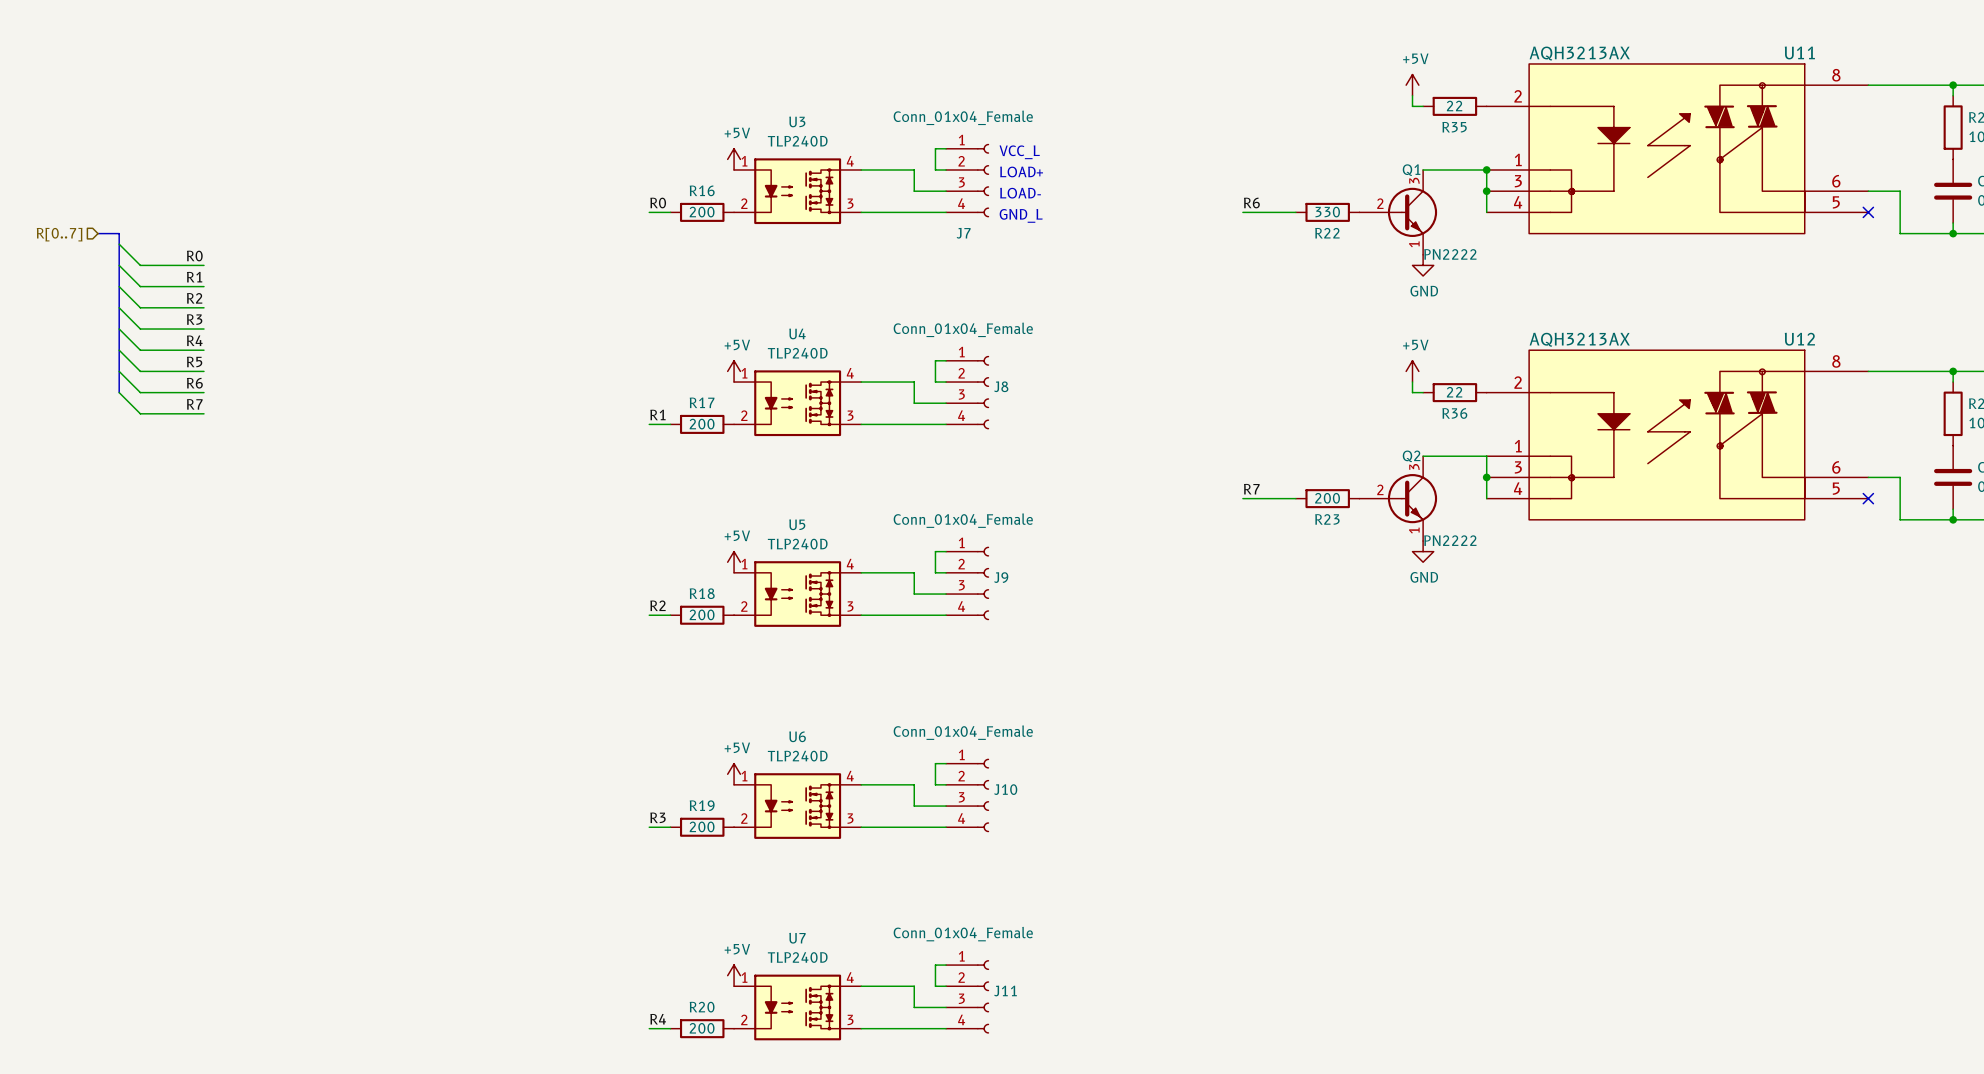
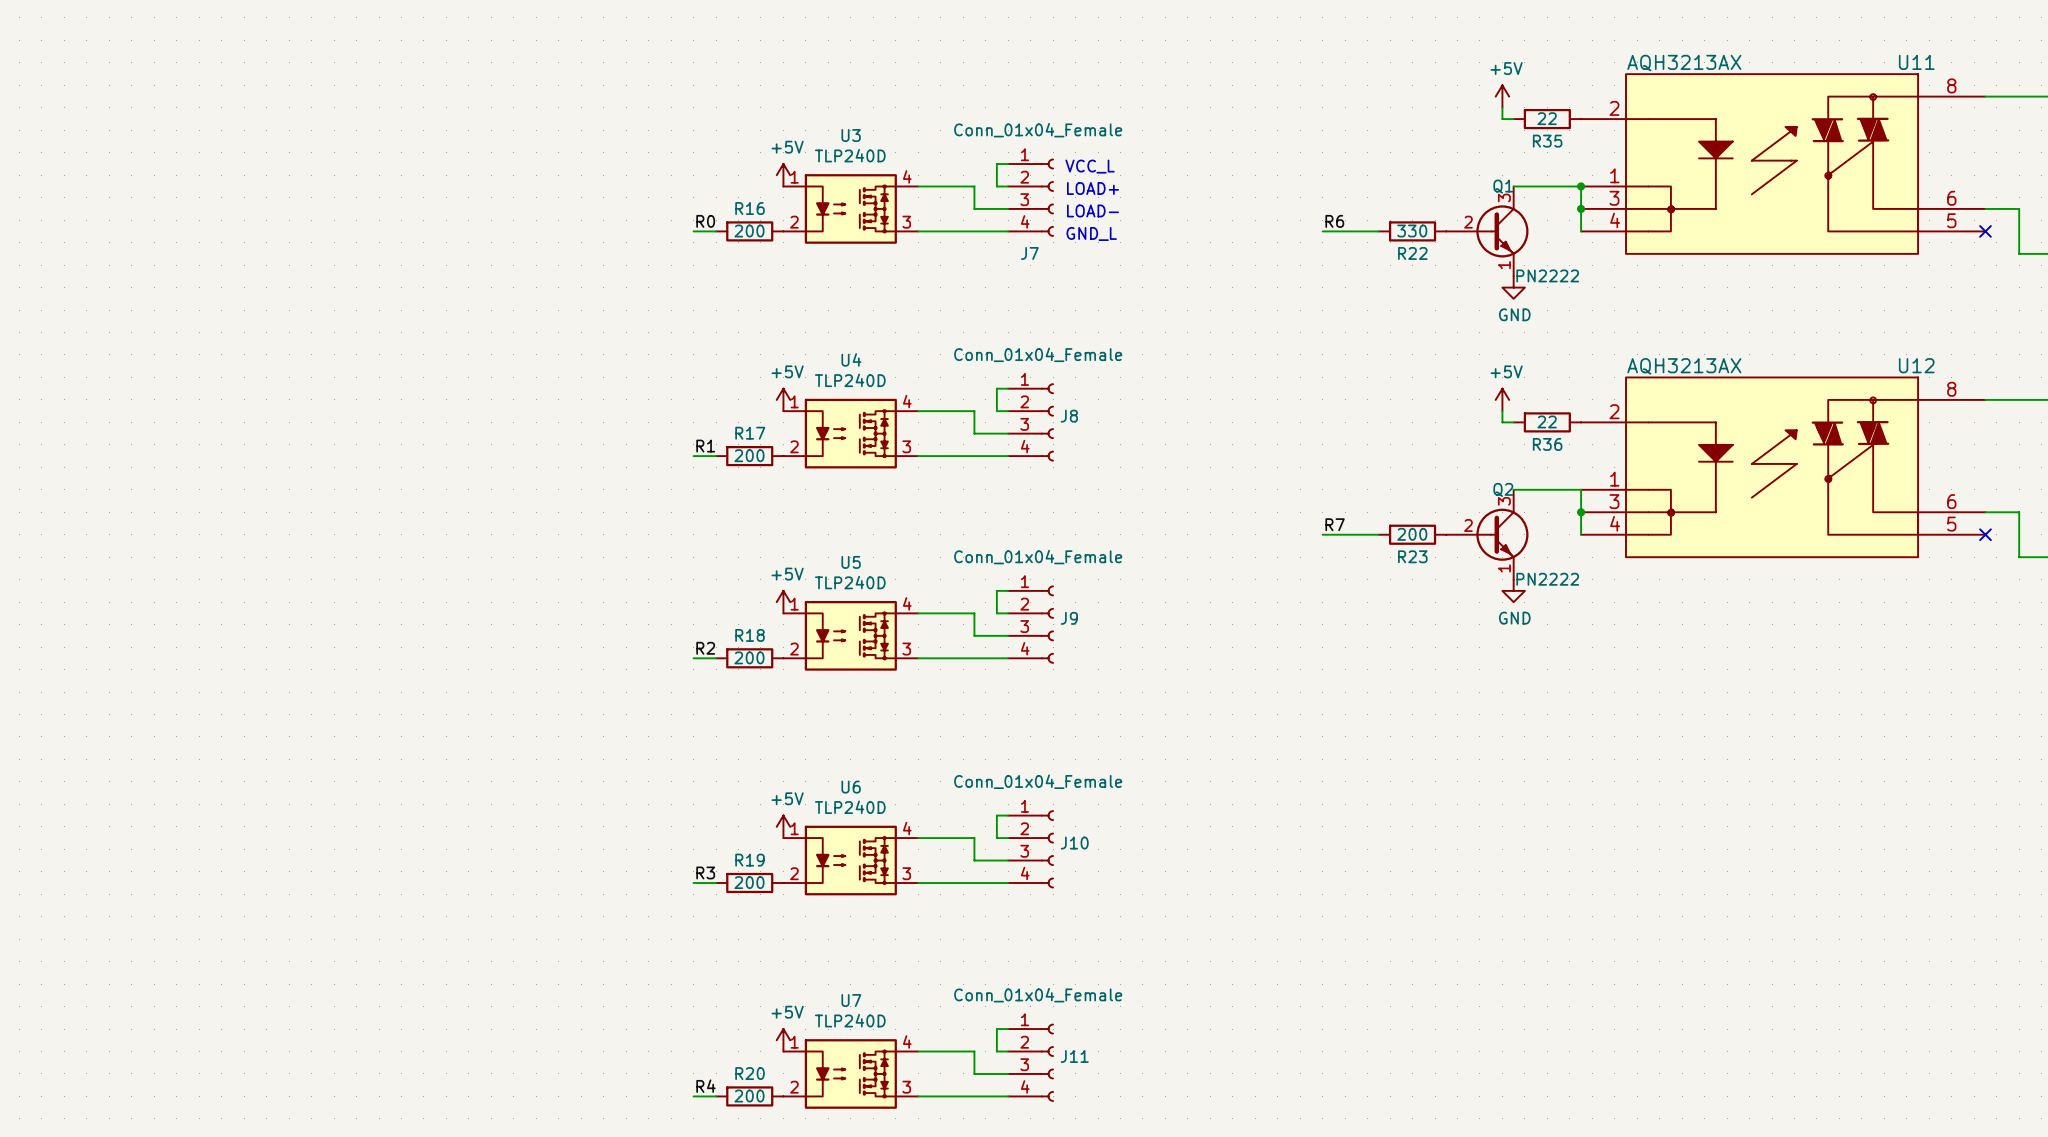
bus: (97, 233) (119, 233) (119, 392) -> none
hierarchical label: R[0..7] (59, 234) -> none
wire: (119, 244) (140, 265) (204, 265) -> none
label: R0 (194, 256) -> none
wire: (119, 265) (140, 286) (204, 286) -> none
label: R1 (194, 277) -> none
wire: (119, 286) (140, 307) (204, 307) -> none
label: R2 (194, 298) -> none
wire: (119, 307) (140, 329) (204, 329) -> none
label: R3 (194, 319) -> none
wire: (119, 329) (140, 350) (204, 350) -> none
label: R4 (194, 340) -> none
wire: (119, 350) (140, 371) (204, 371) -> none
label: R5 (194, 361) -> none
wire: (119, 371) (140, 392) (204, 392) -> none
label: R6 (194, 383) -> none
wire: (119, 392) (140, 413) (204, 413) -> none
label: R7 (194, 404) -> none

